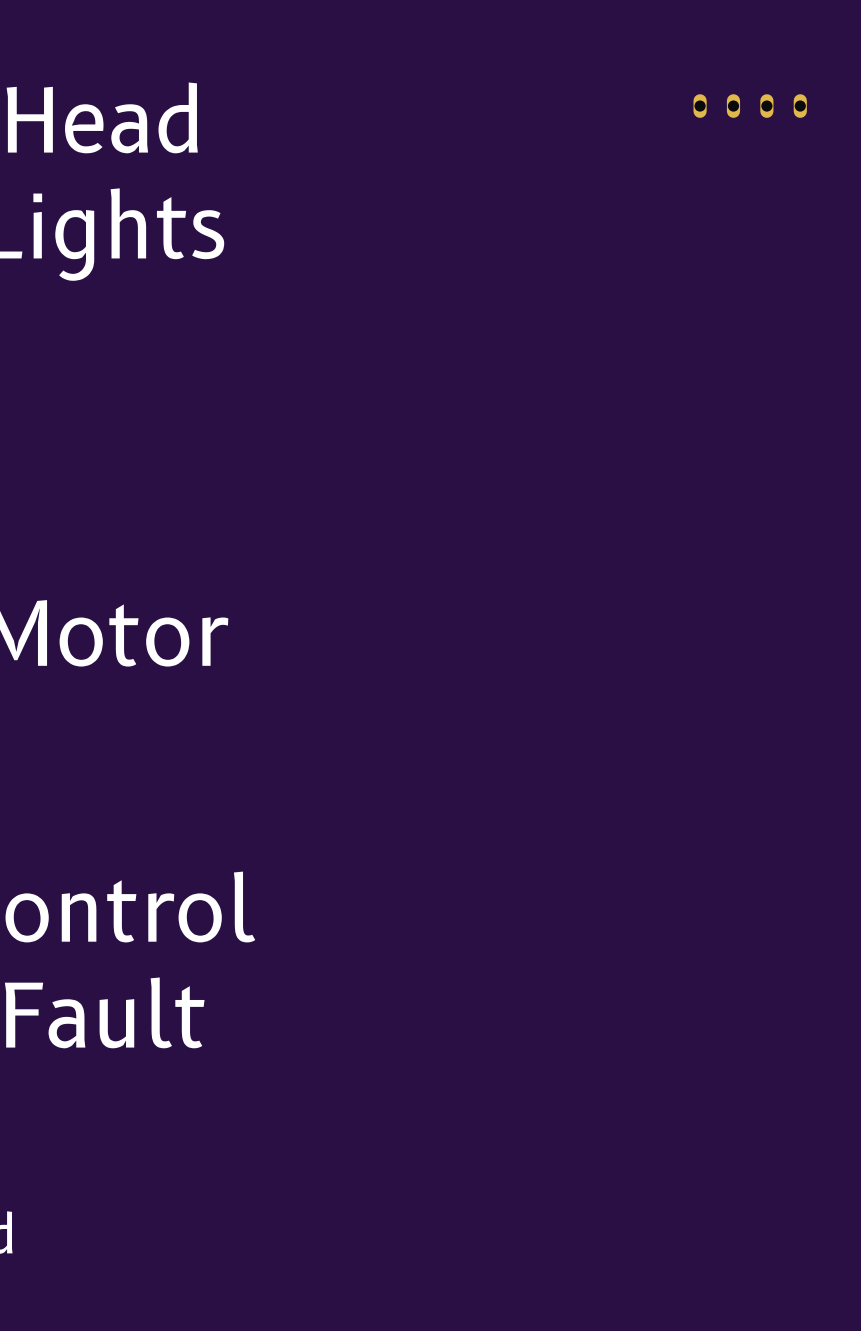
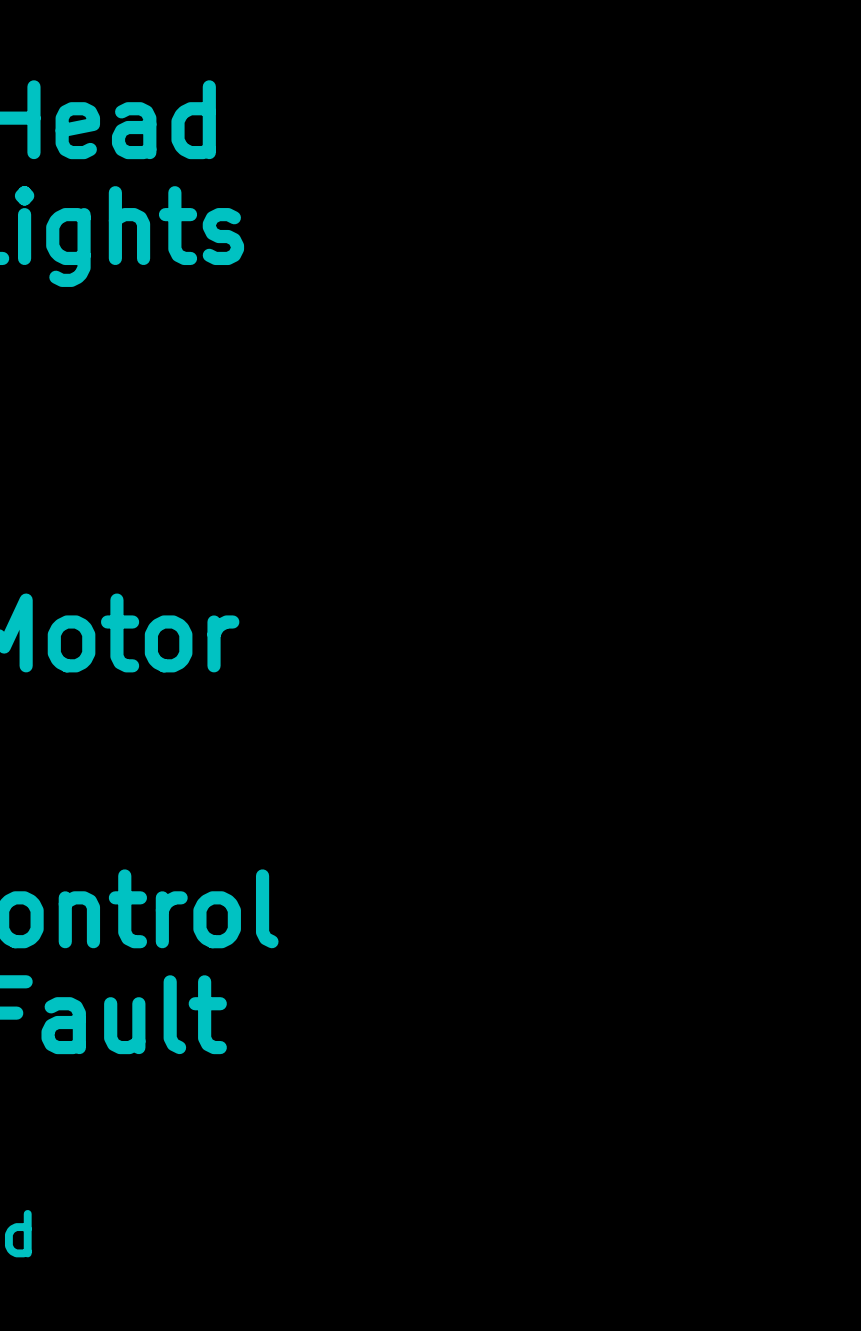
part: (750, 106) -> none

